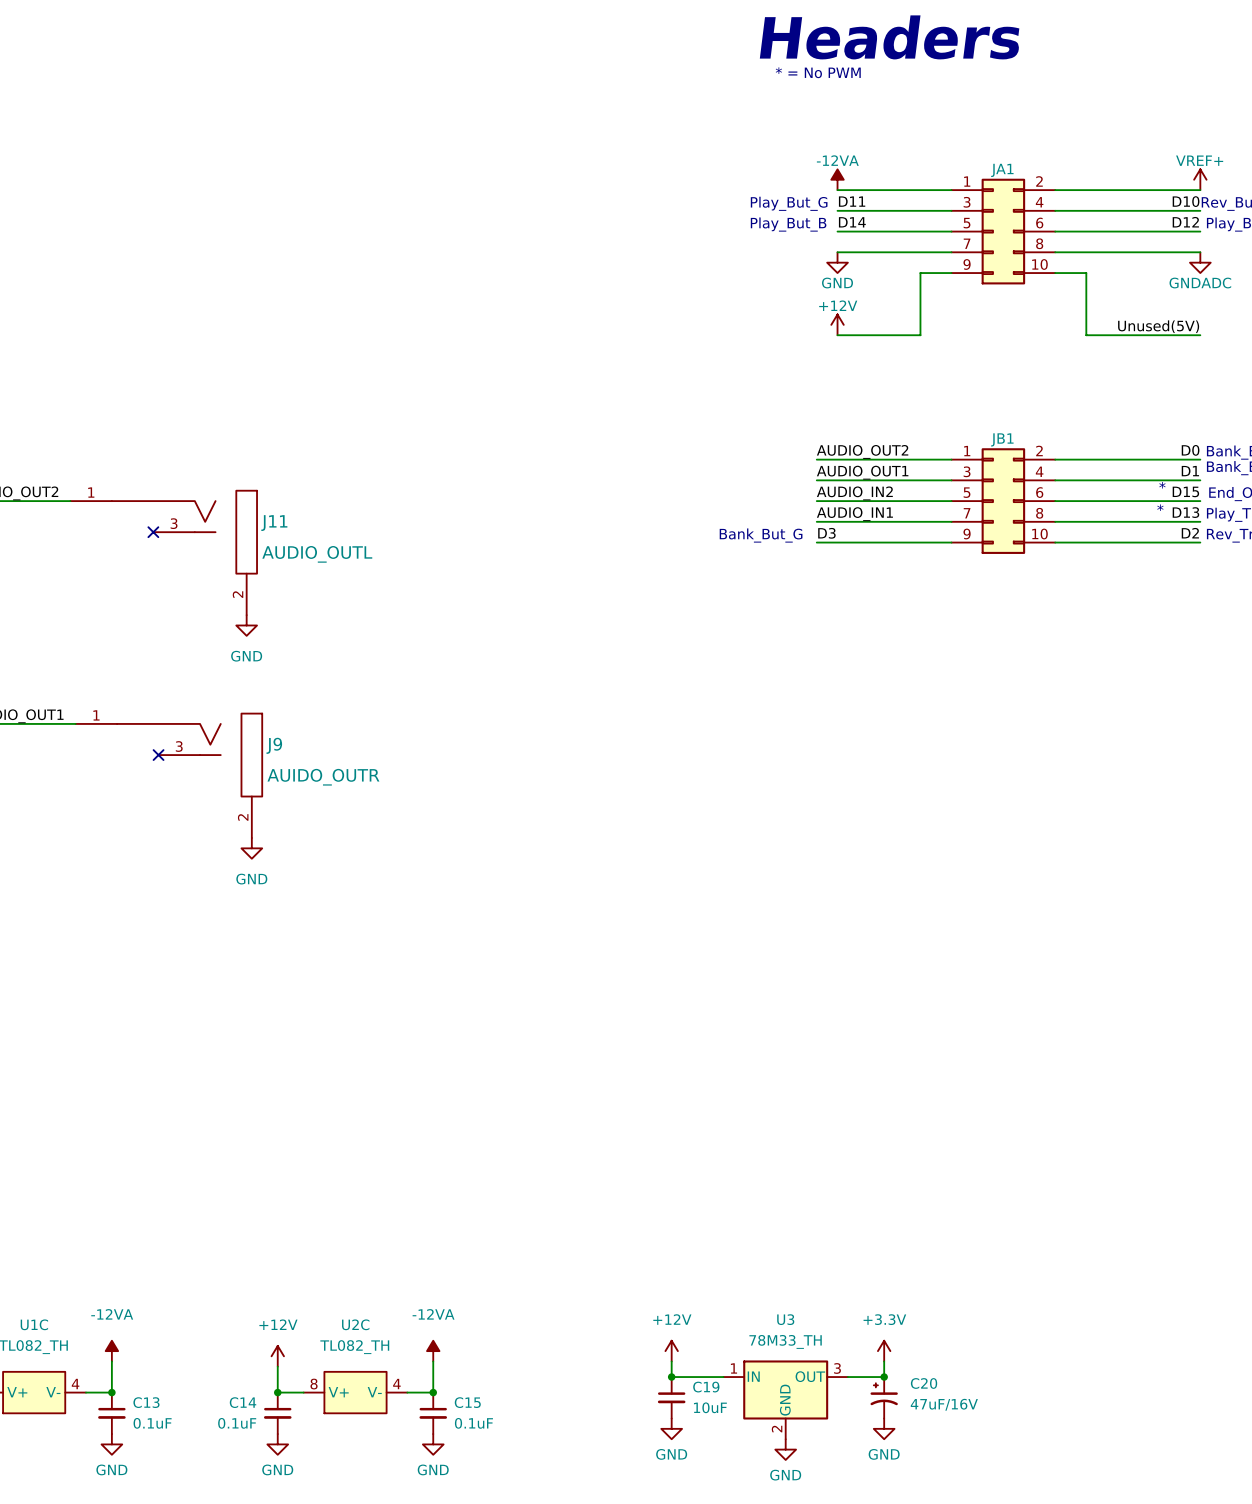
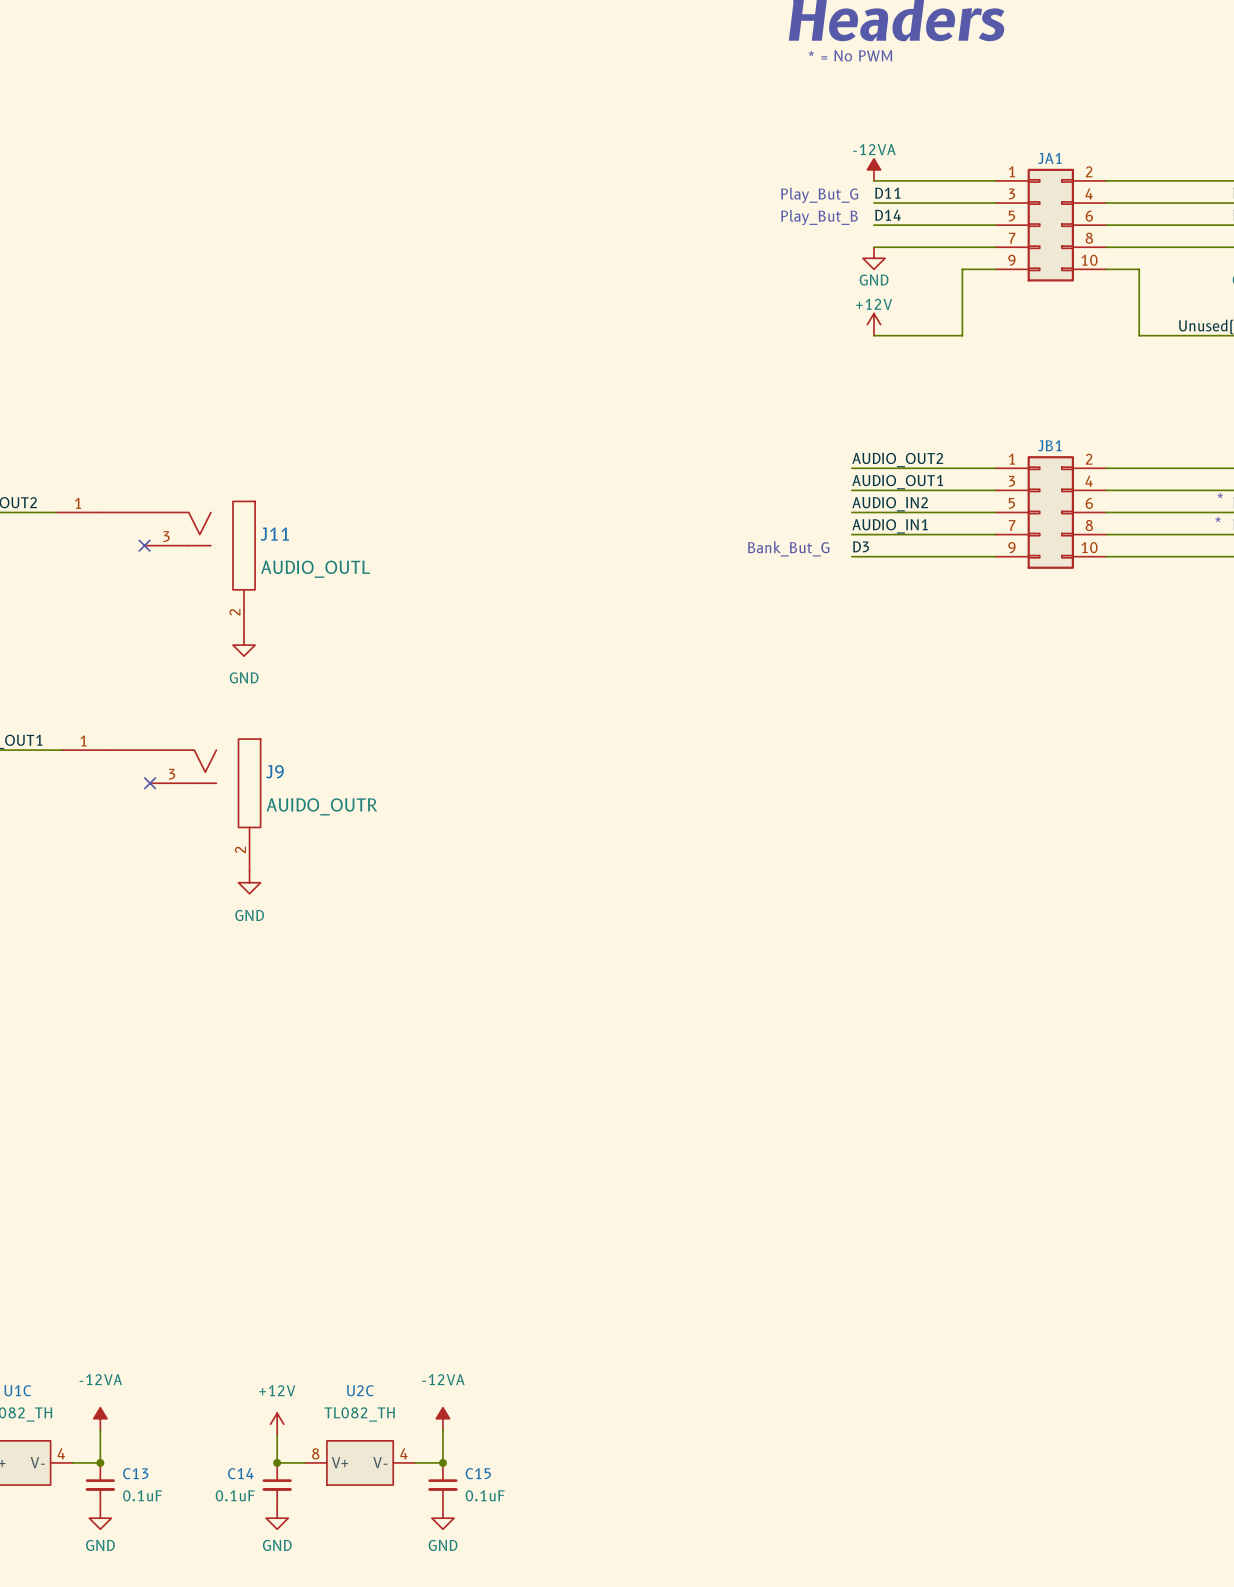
power symbol: +12V (671, 1351) -> none
power symbol: +3.3V (884, 1351) -> none
wire: (671, 1361) (671, 1377) (723, 1377) -> none
wire: (884, 1361) (884, 1377) (847, 1377) -> none
junction: (671, 1377) -> none
junction: (884, 1377) -> none
C19: (671, 1397) -> none
C20: (884, 1397) -> none
U3: 78M33_TH (785, 1399) -> none
power symbol: GND (671, 1428) -> none
power symbol: GND (884, 1428) -> none
power symbol: GND (785, 1449) -> none

